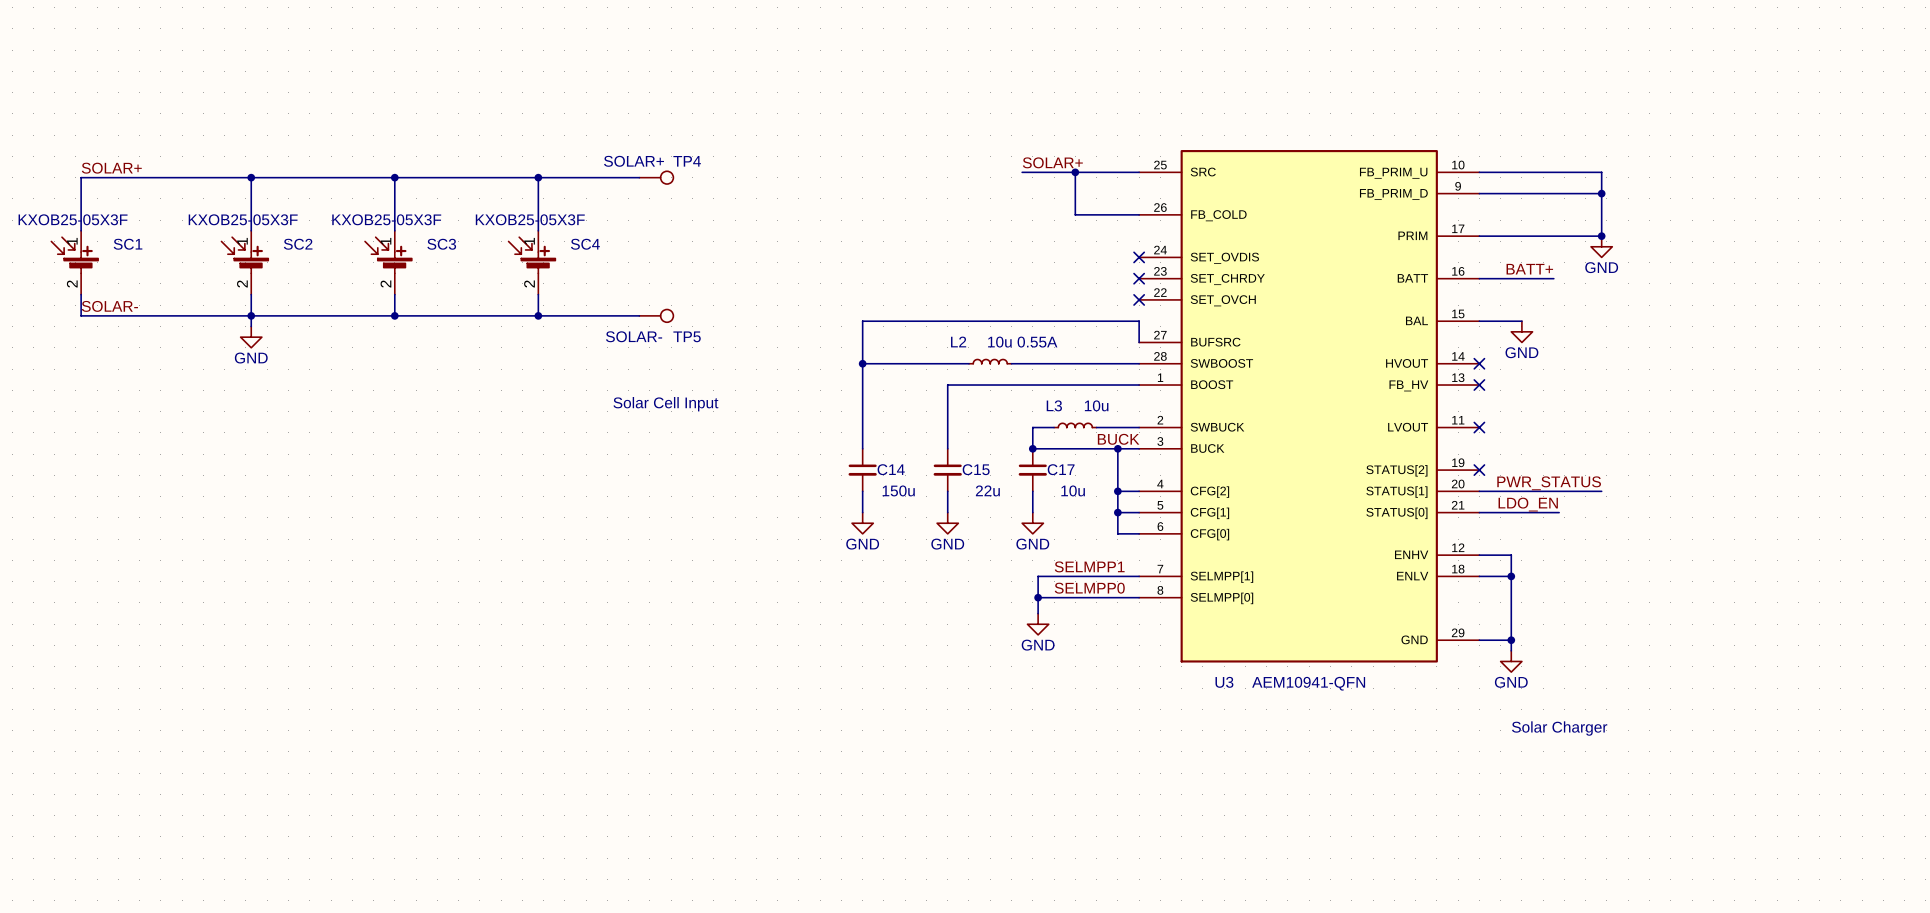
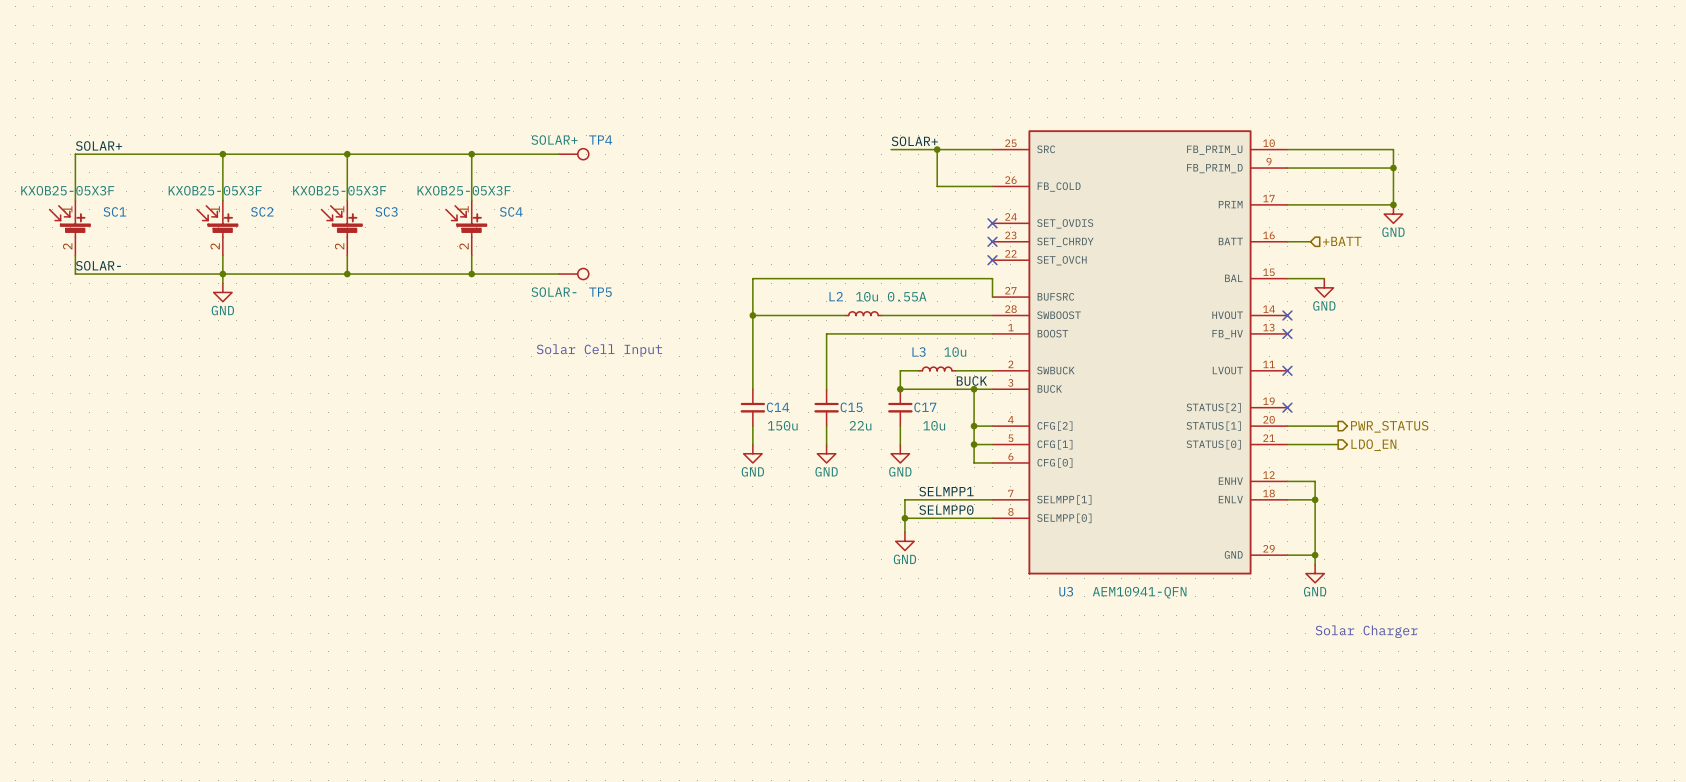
label: BATT+ (1529, 269) -> none
wire: (1505, 278) (1553, 278) -> none
hierarchical label: none -> +BATT (1342, 241)
label: PWR_STATUS (1549, 483) -> none
wire: (1537, 491) (1601, 491) -> none
hierarchical label: none -> PWR_STATUS (1389, 426)
label: LDO_EN (1528, 504) -> none
wire: (1537, 512) (1559, 512) -> none
hierarchical label: none -> LDO_EN (1373, 445)

